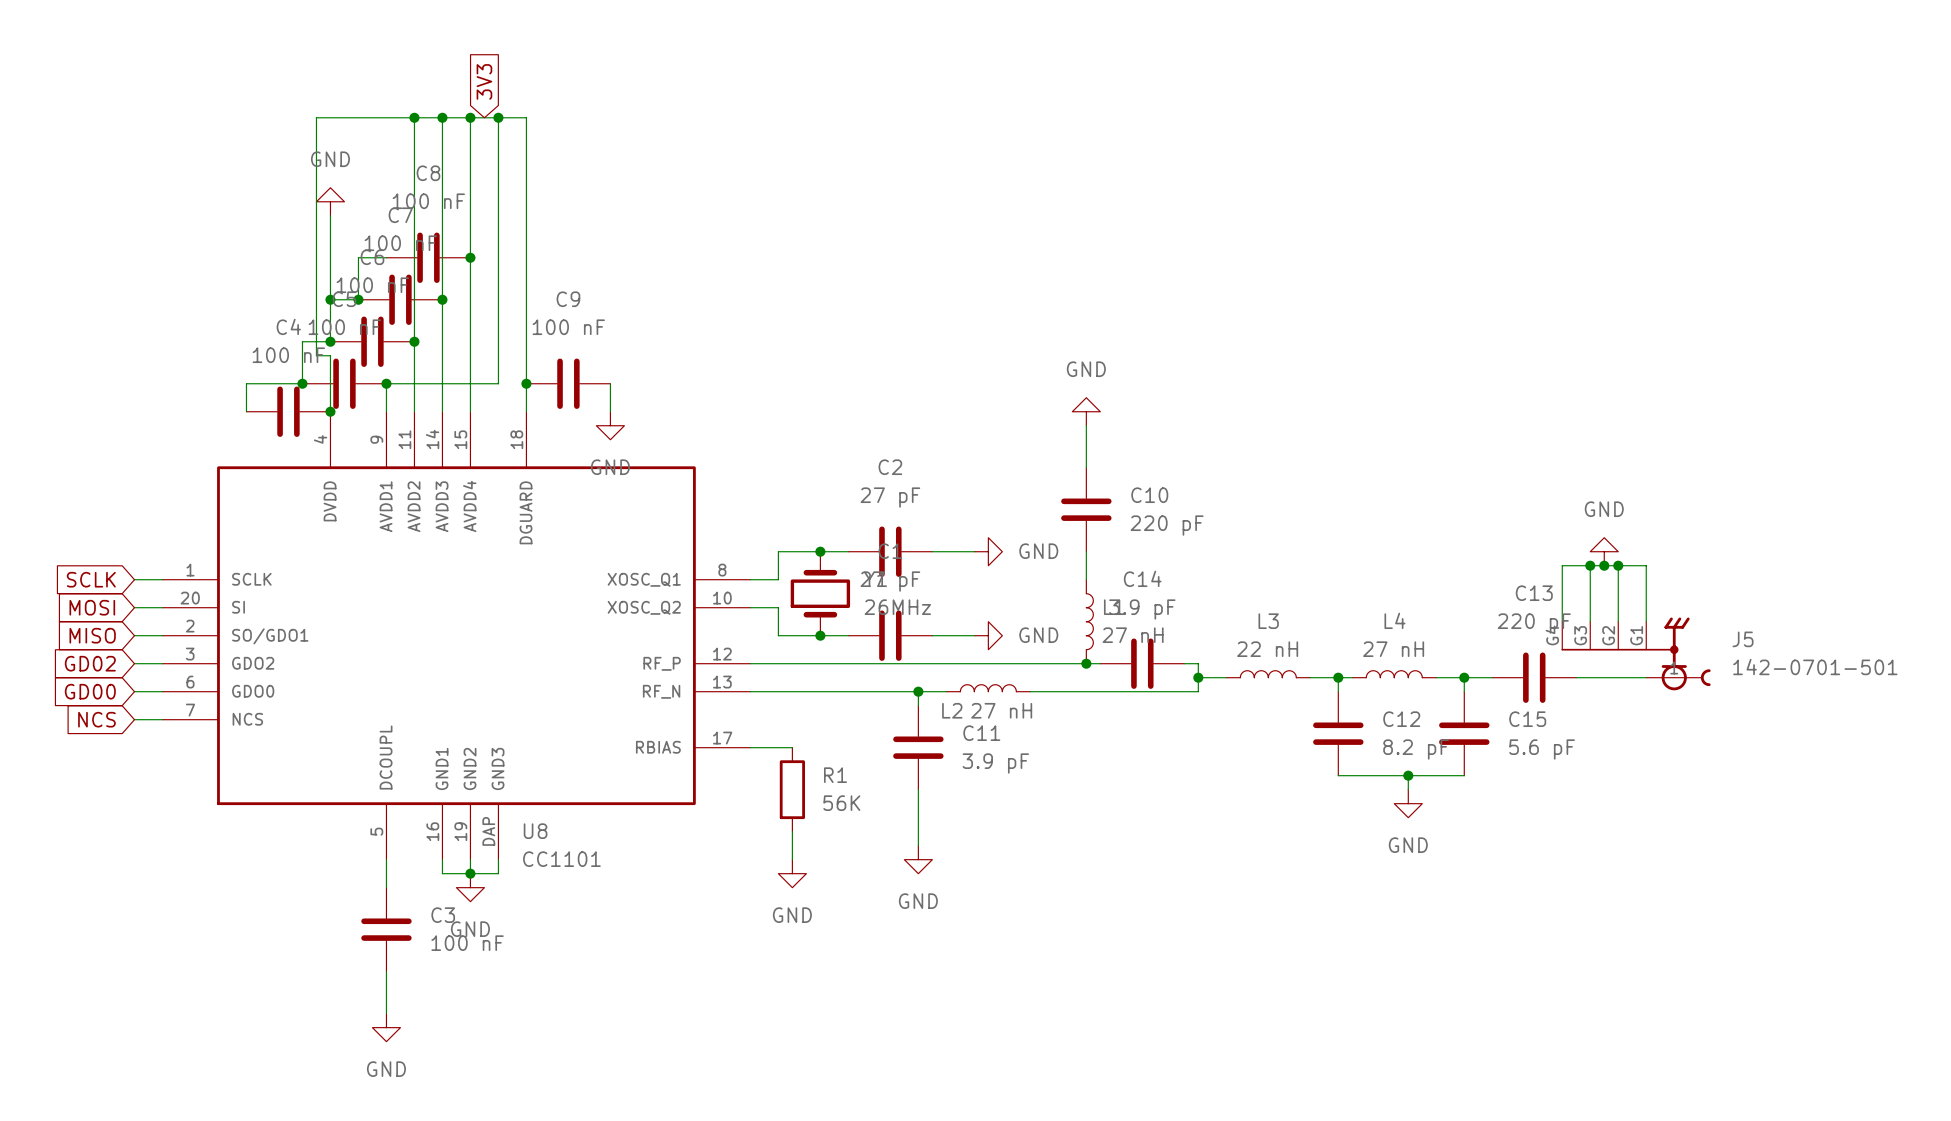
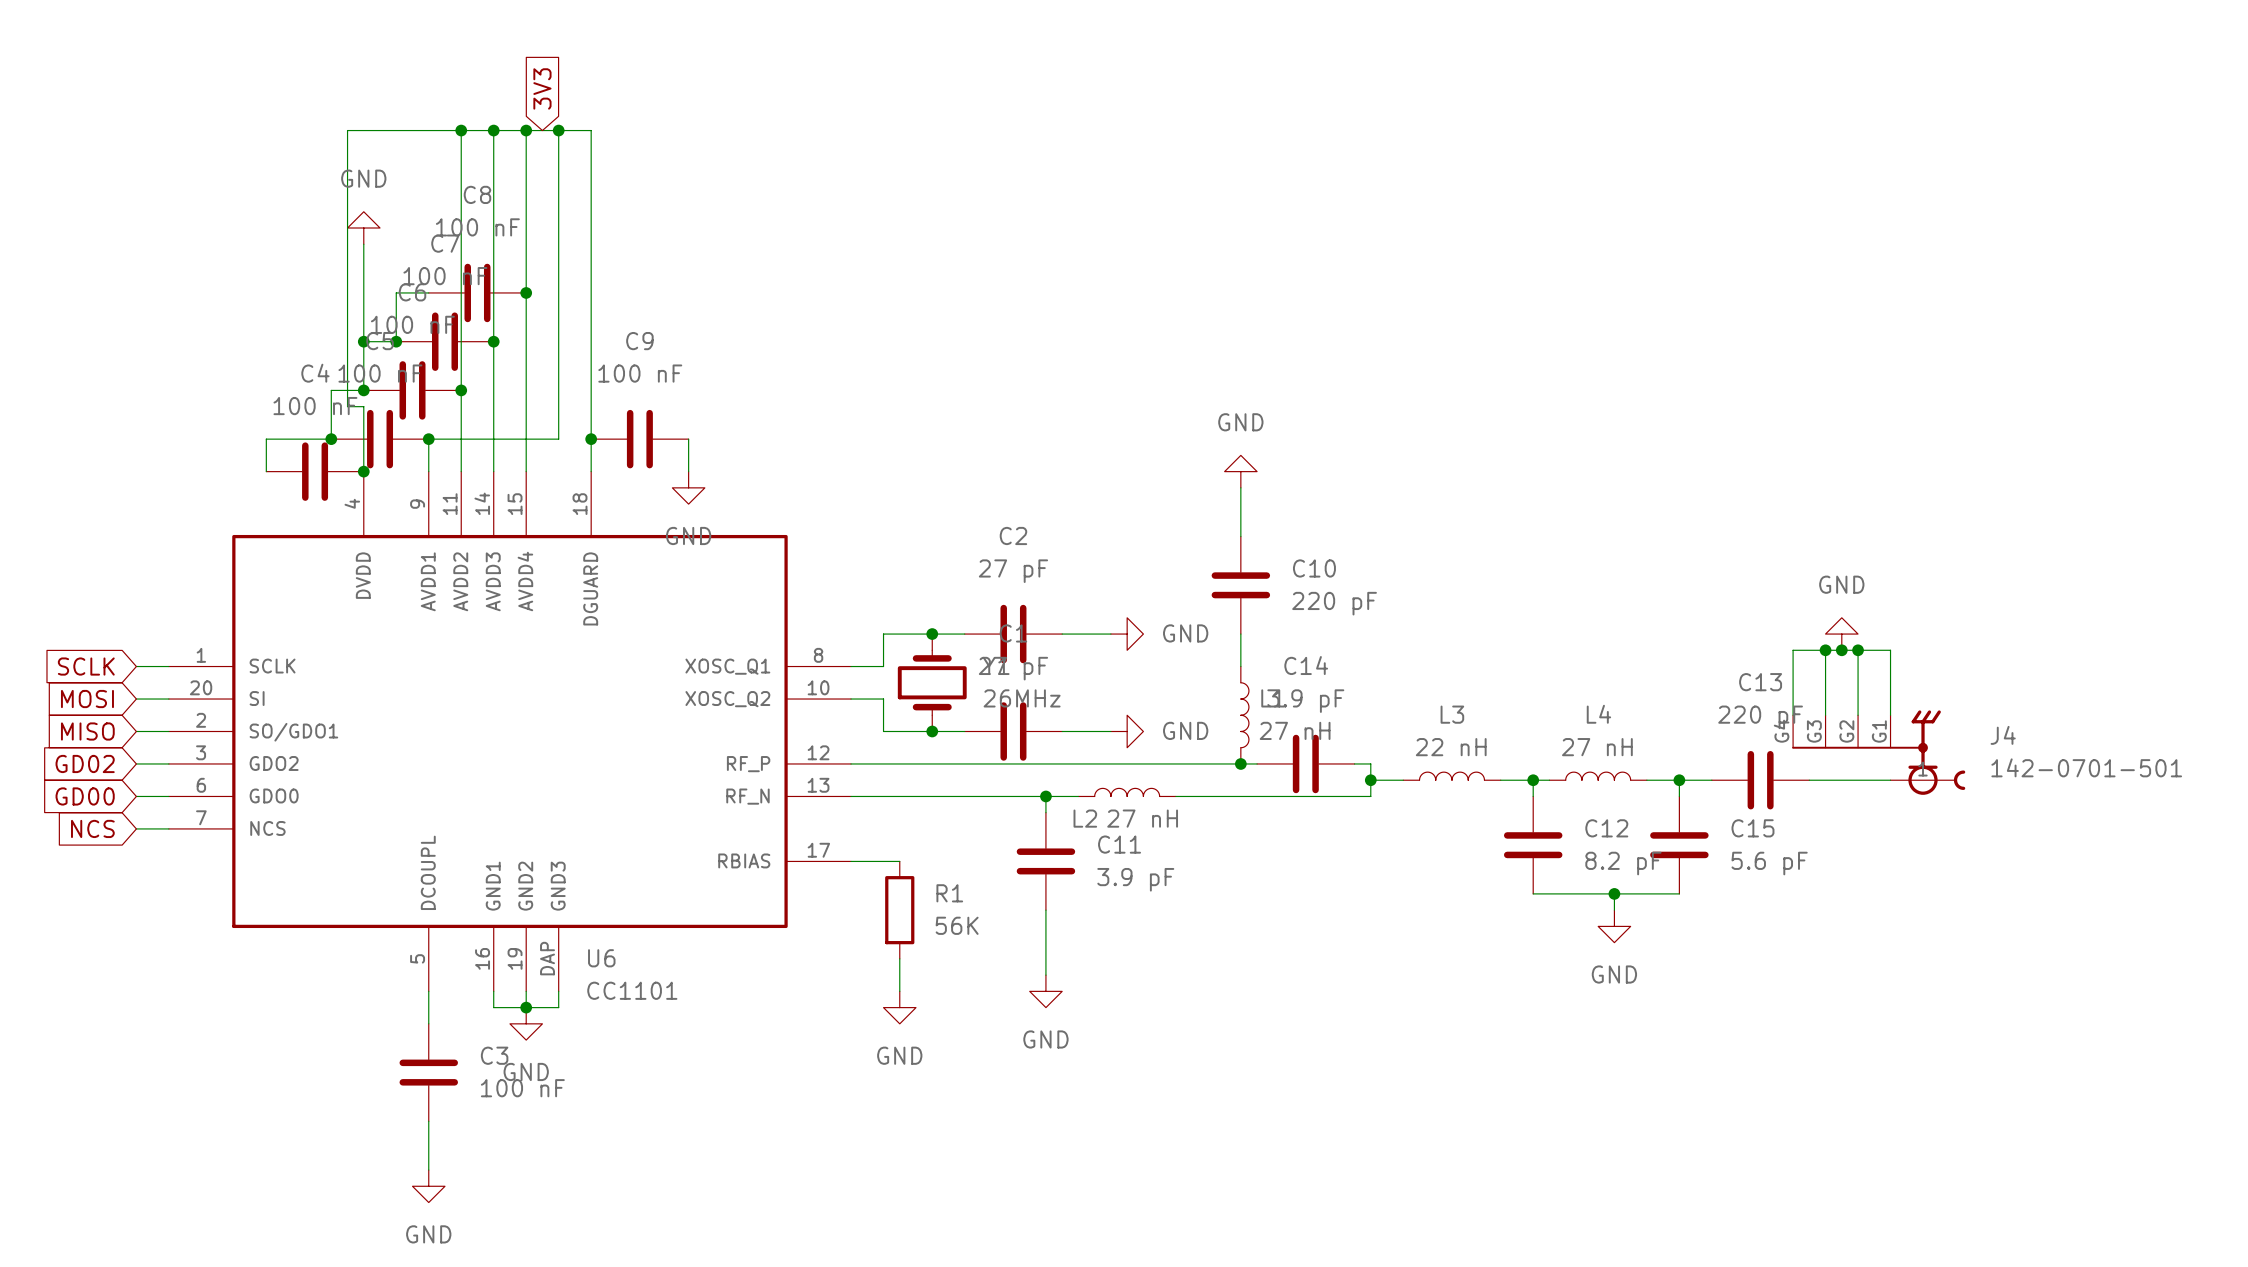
J5 name: J5 (1743, 639) -> J4 (2003, 735)
U8 name: U8 (535, 831) -> U6 (601, 958)

